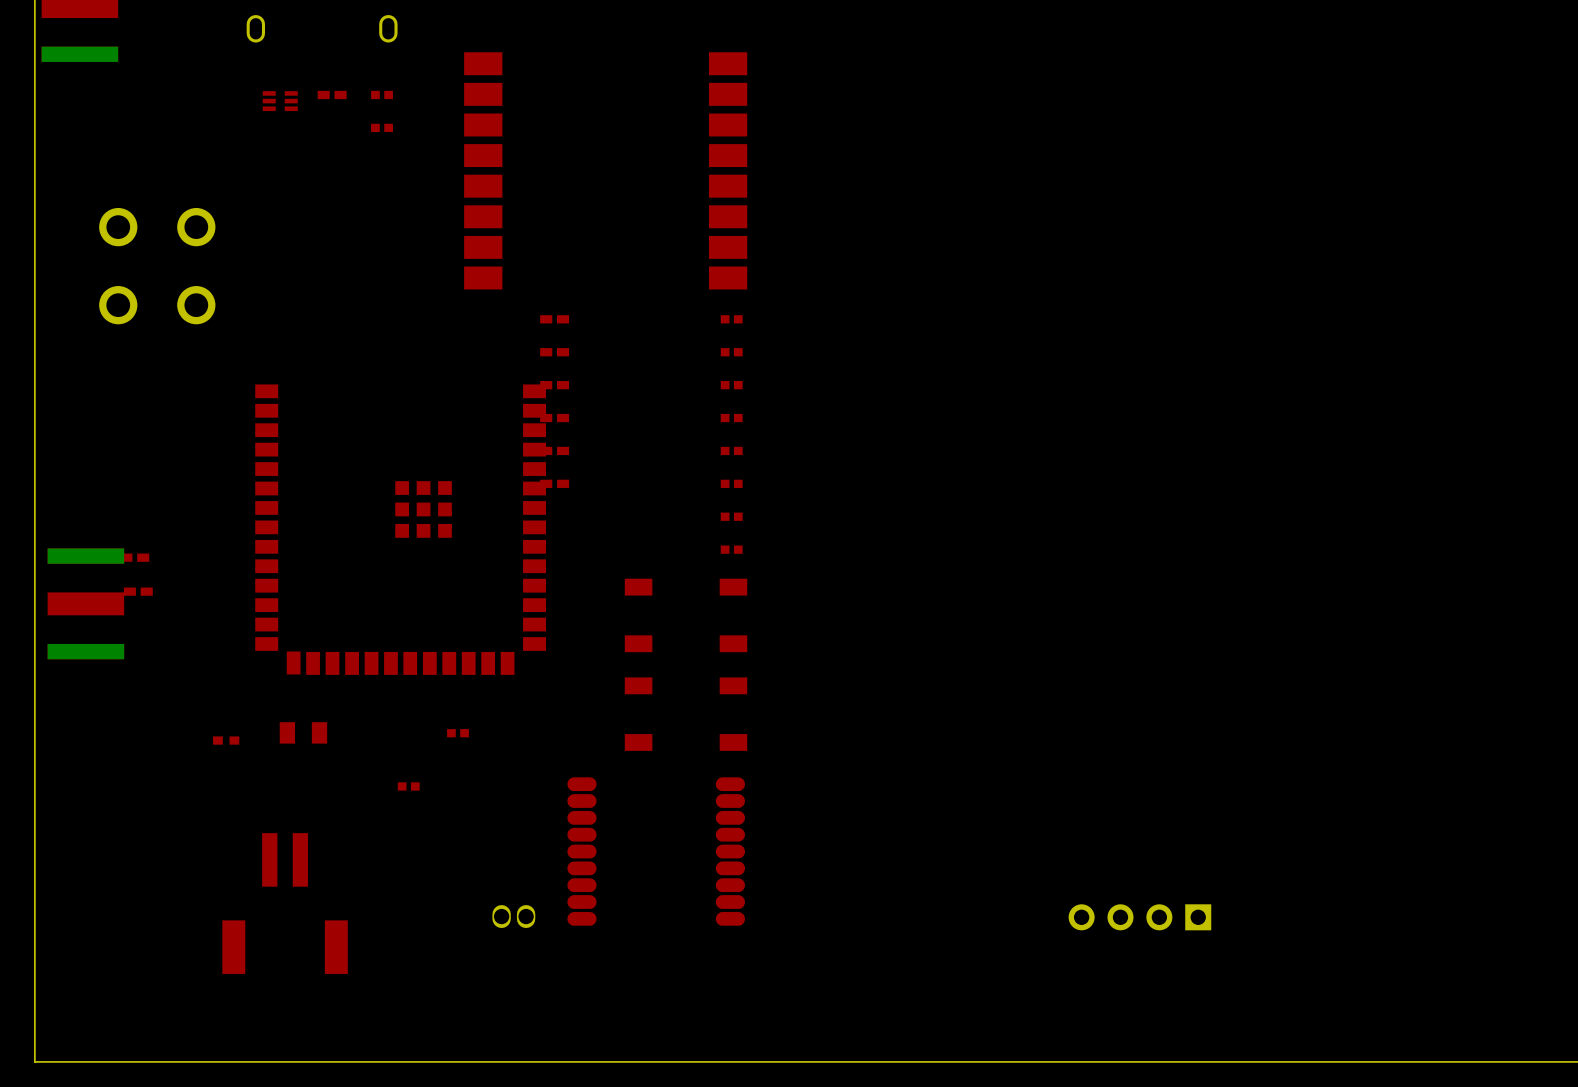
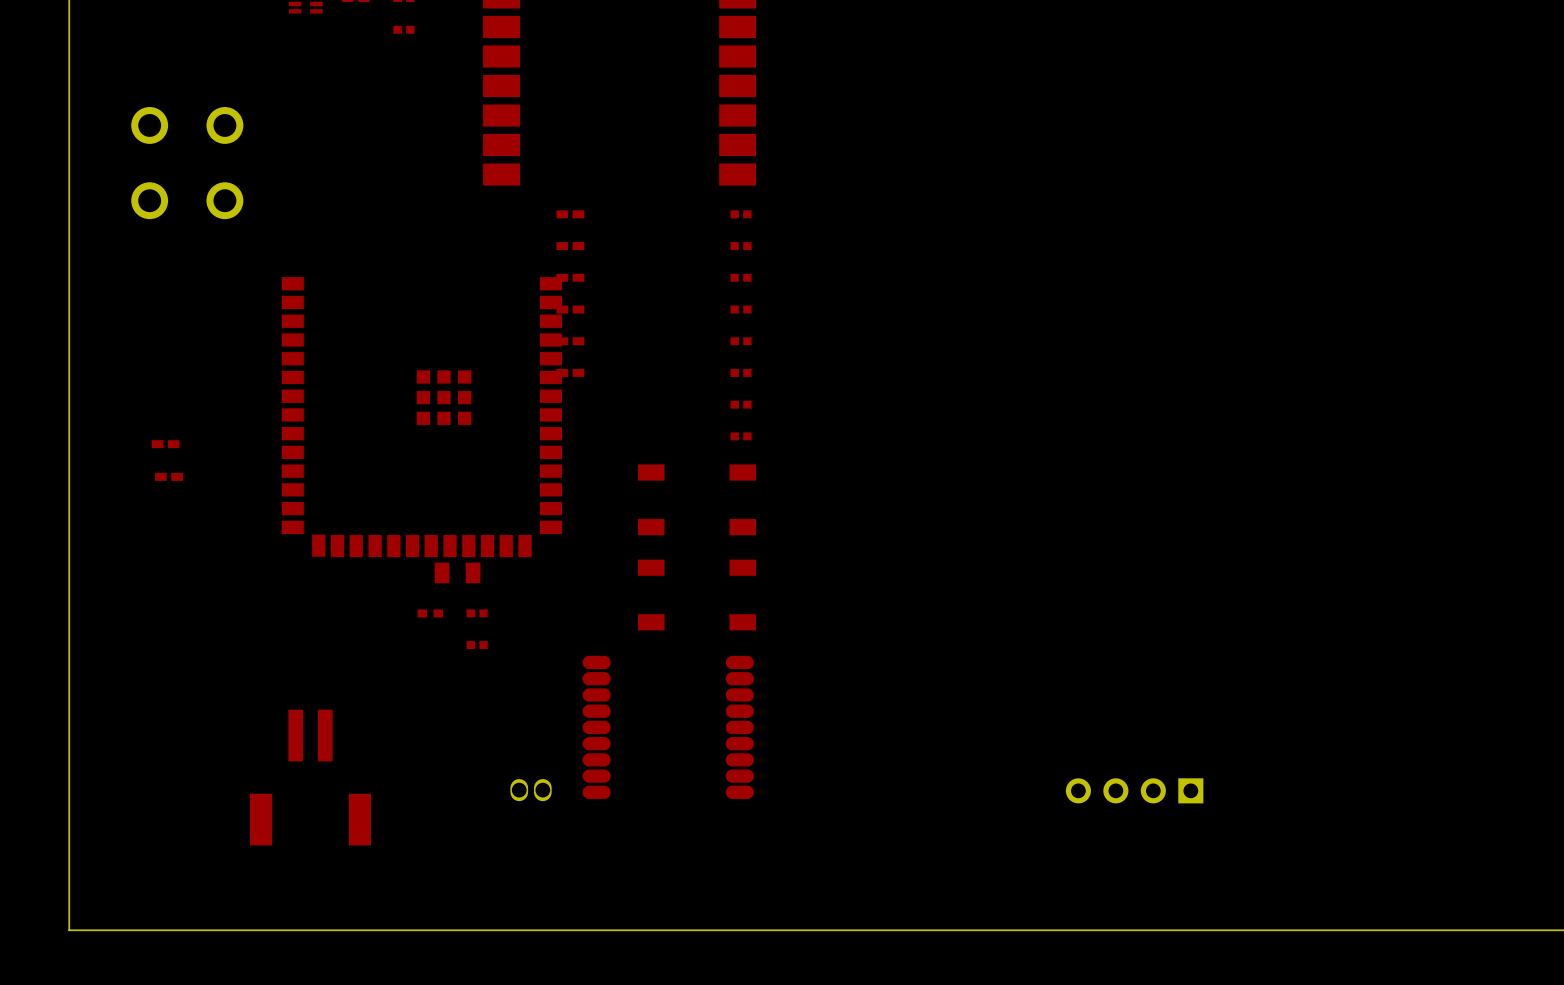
part: (85, 603) -> none
part position: (303, 732) -> (457, 572)
part position: (226, 740) -> (430, 613)
part position: (408, 786) -> (477, 645)

